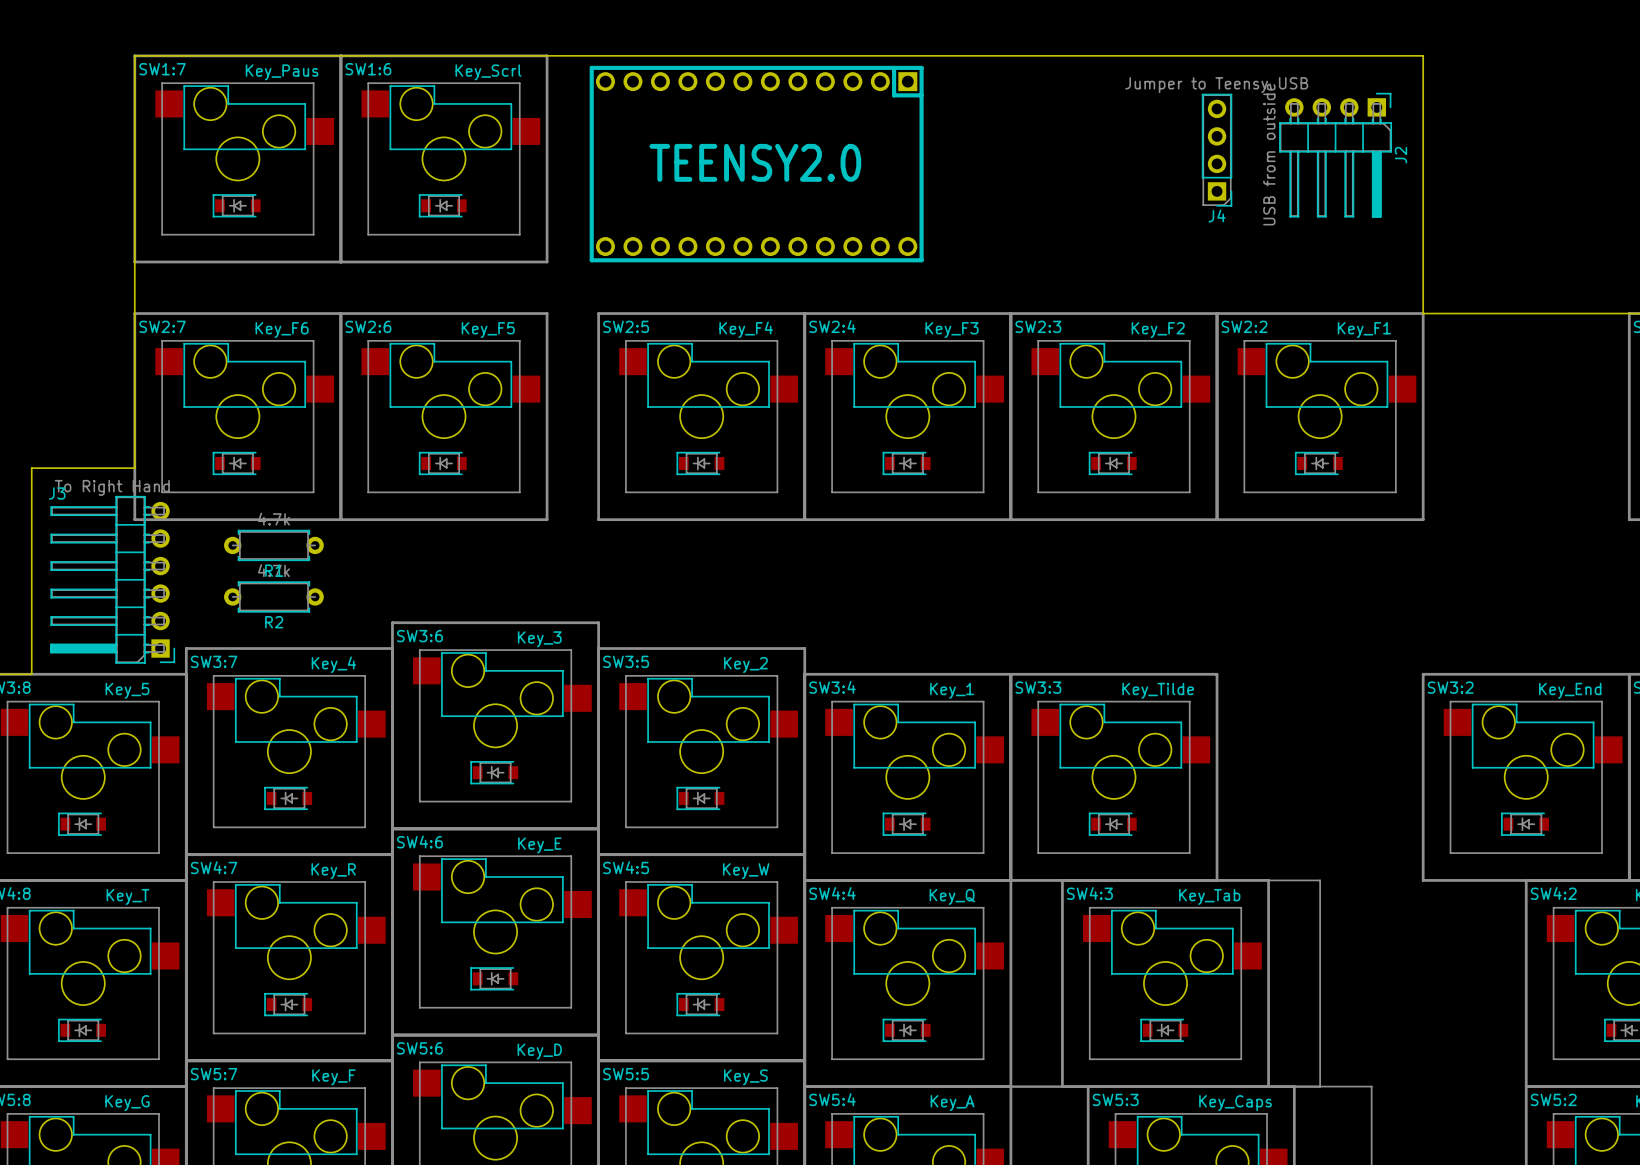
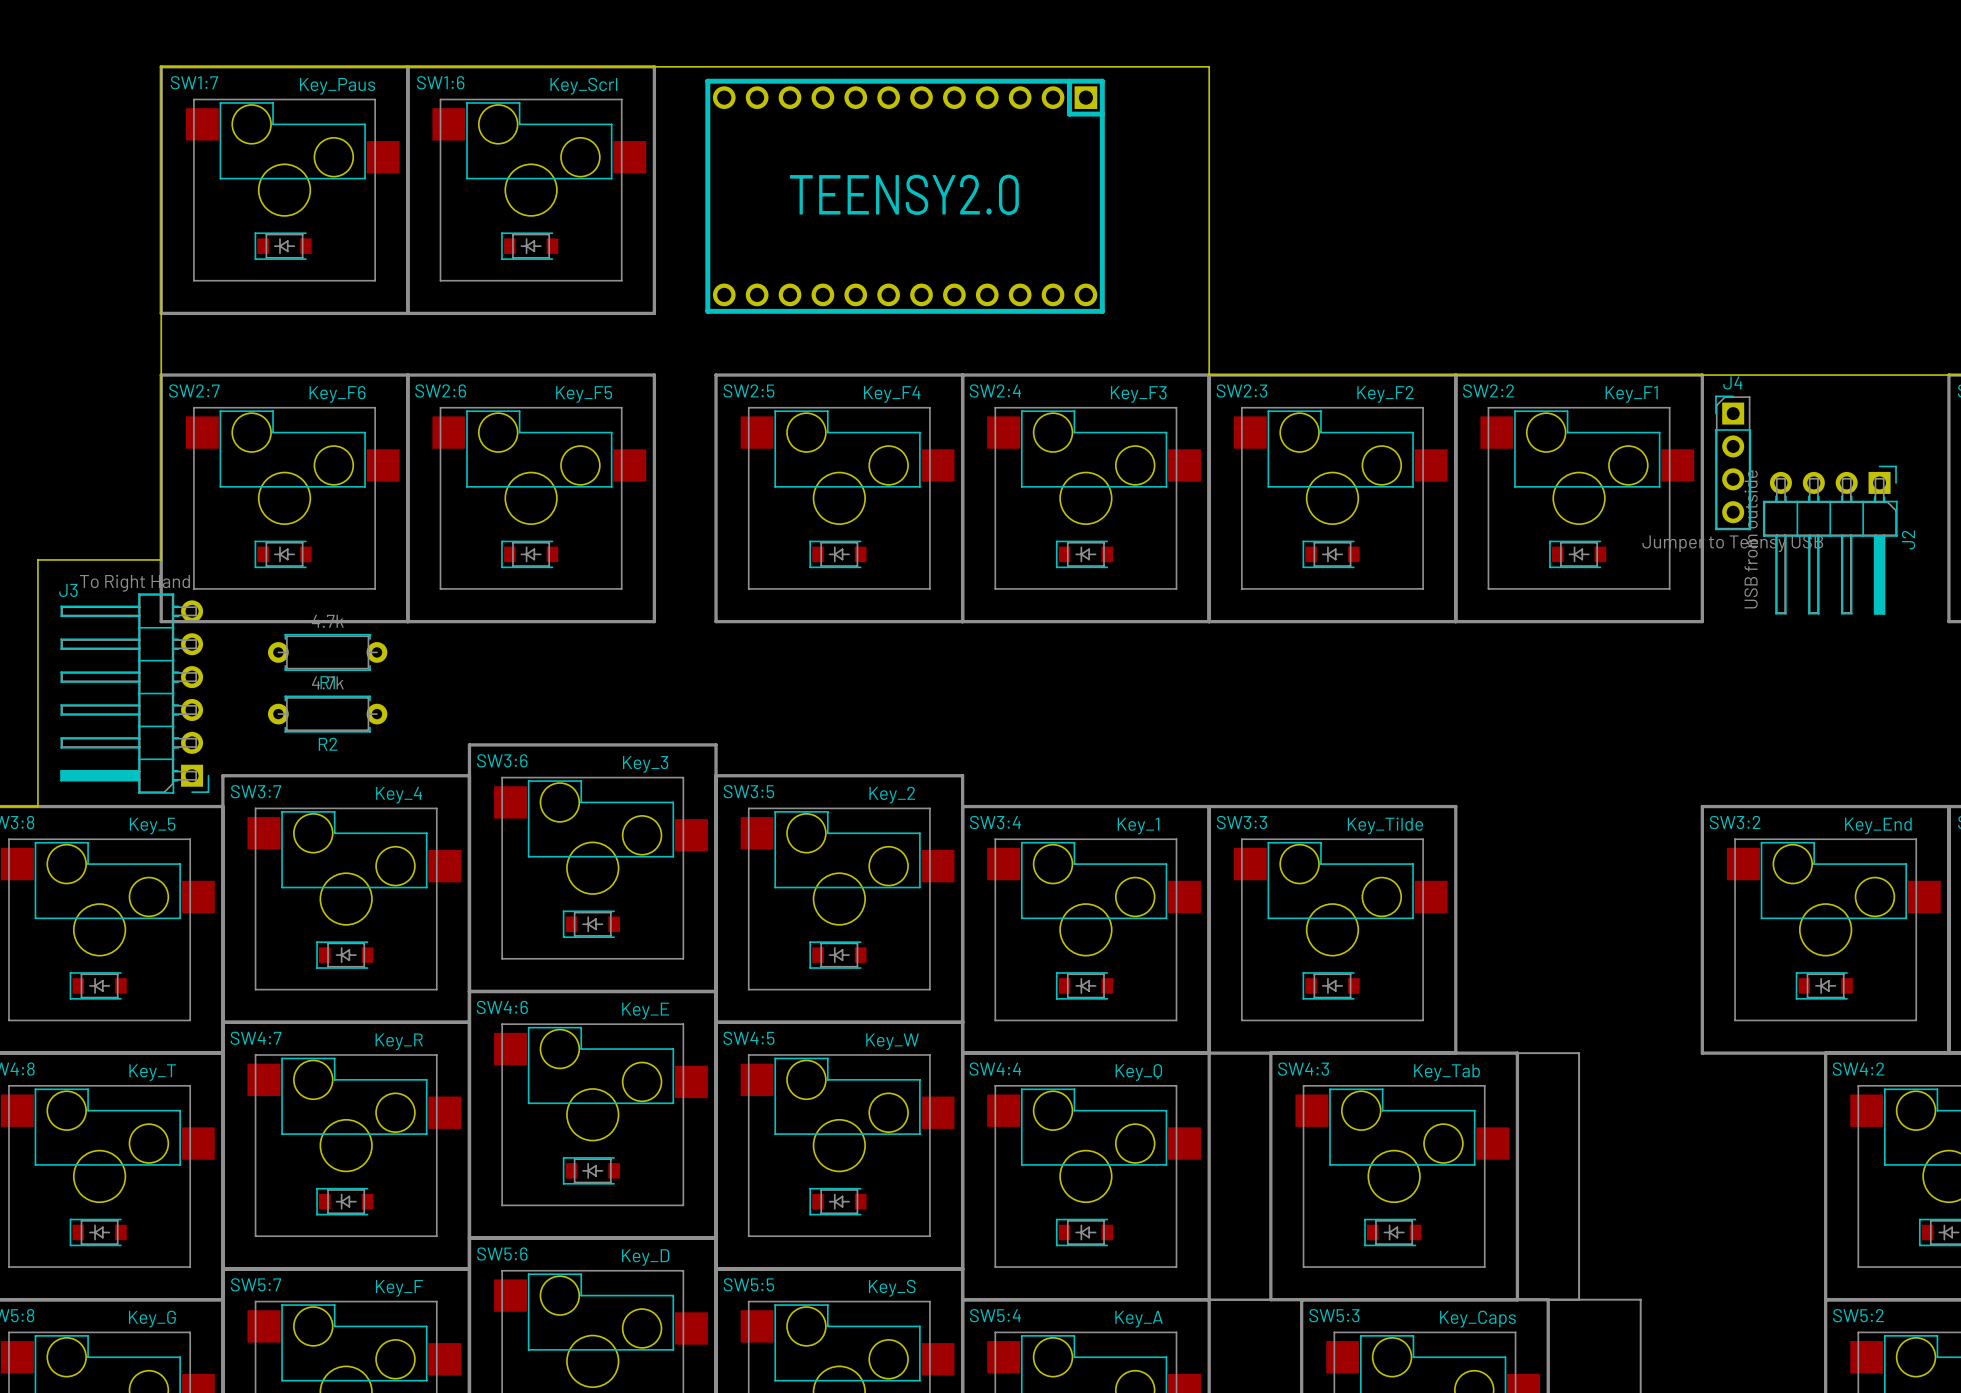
board edge: (1010, 55) (1423, 55) (1423, 313) -> (1209, 66) (1209, 375) (1702, 375)
J4 rotation: 0° (1217, 150) -> 180° (1733, 462)
J4 position: (1217, 150) -> (1733, 462)
J2 position: (1335, 155) -> (1830, 540)

